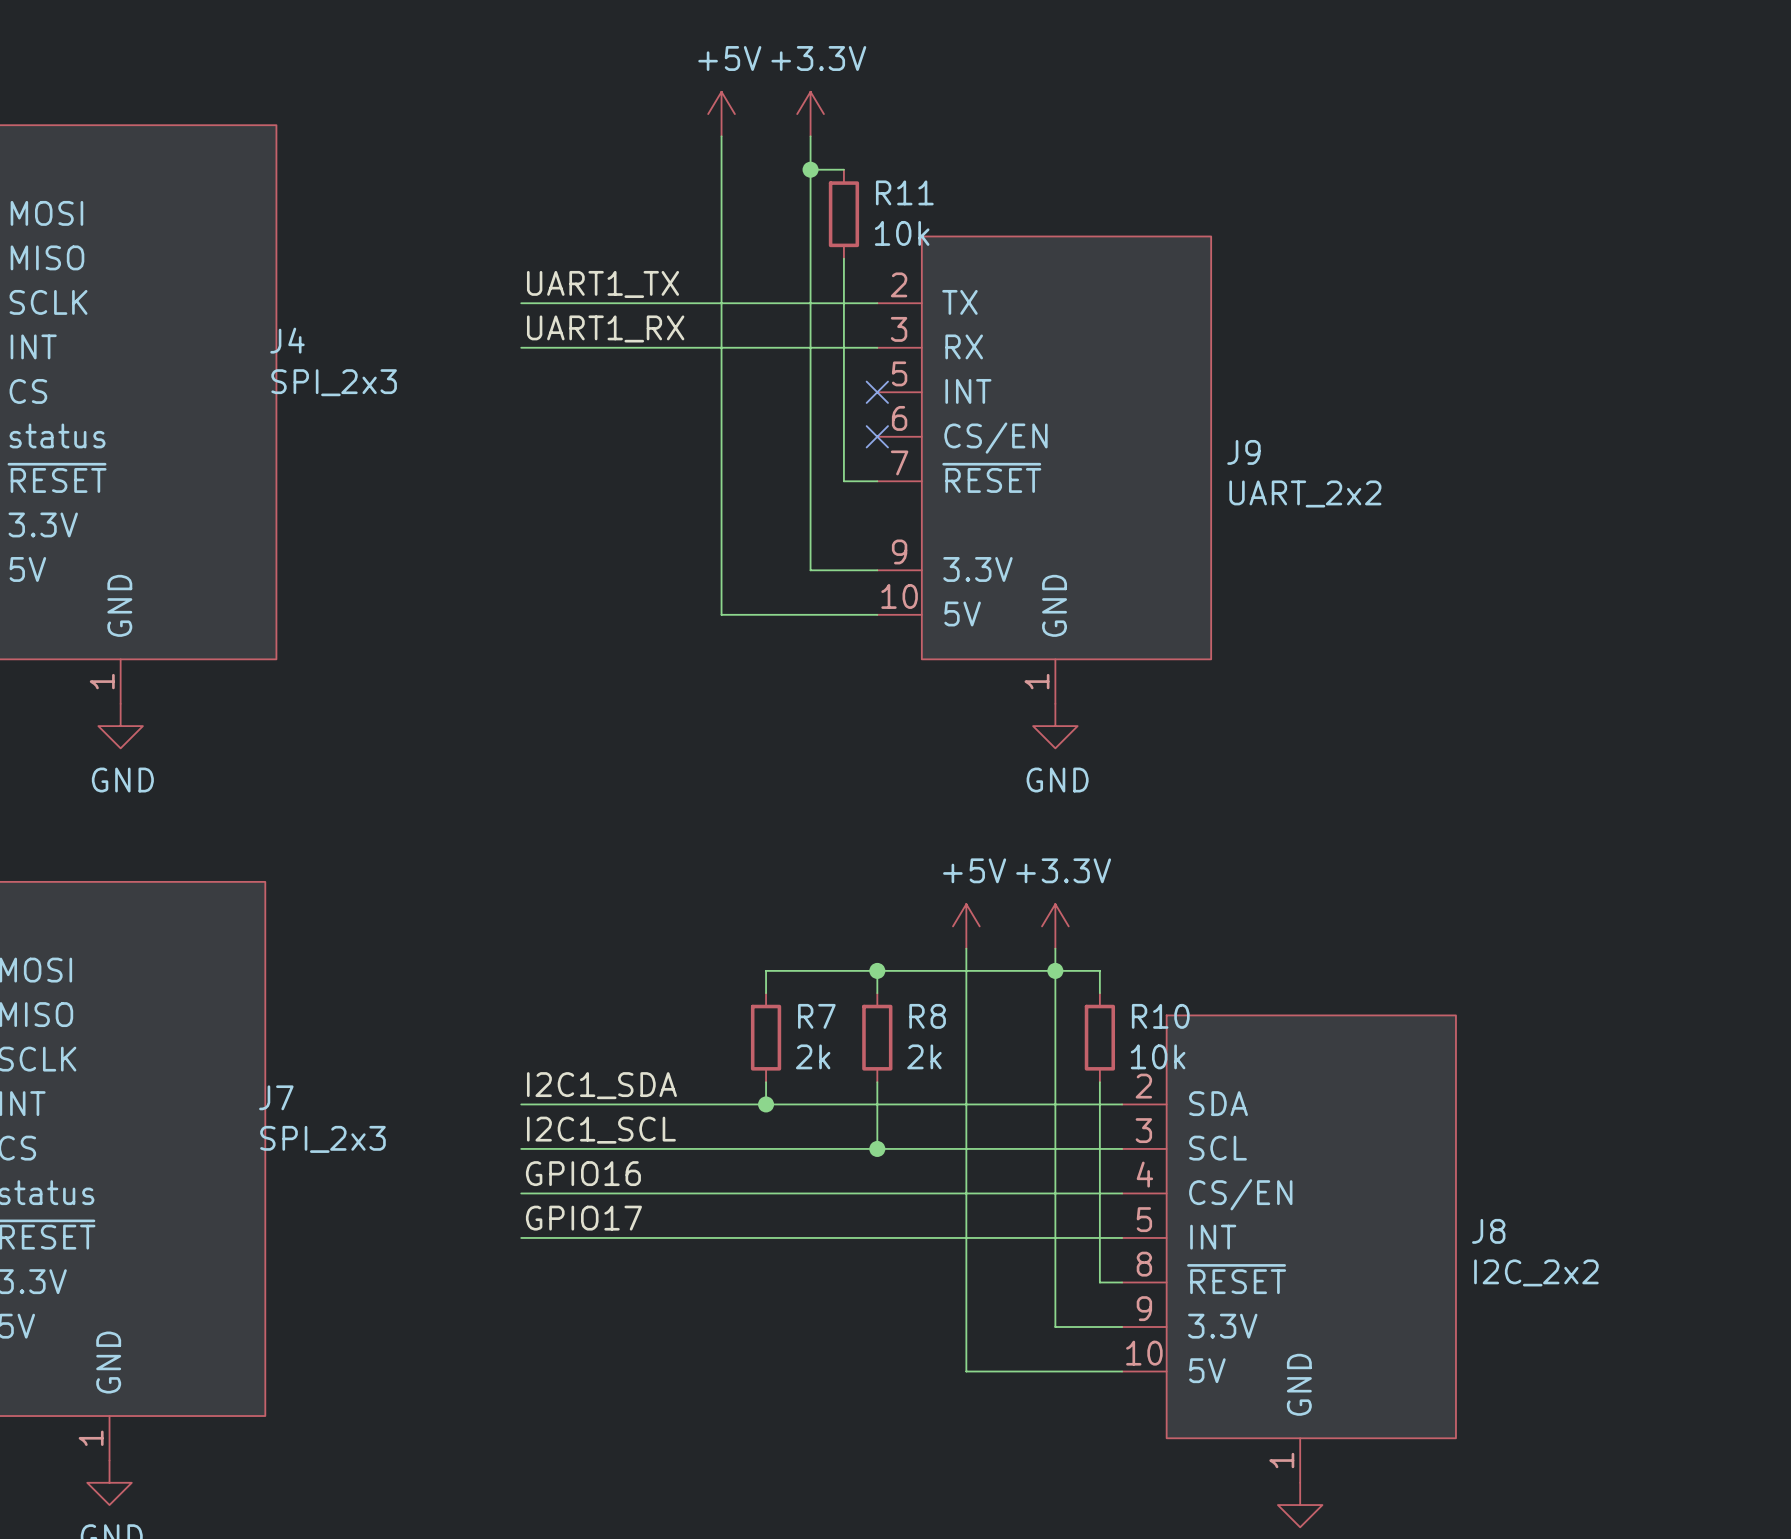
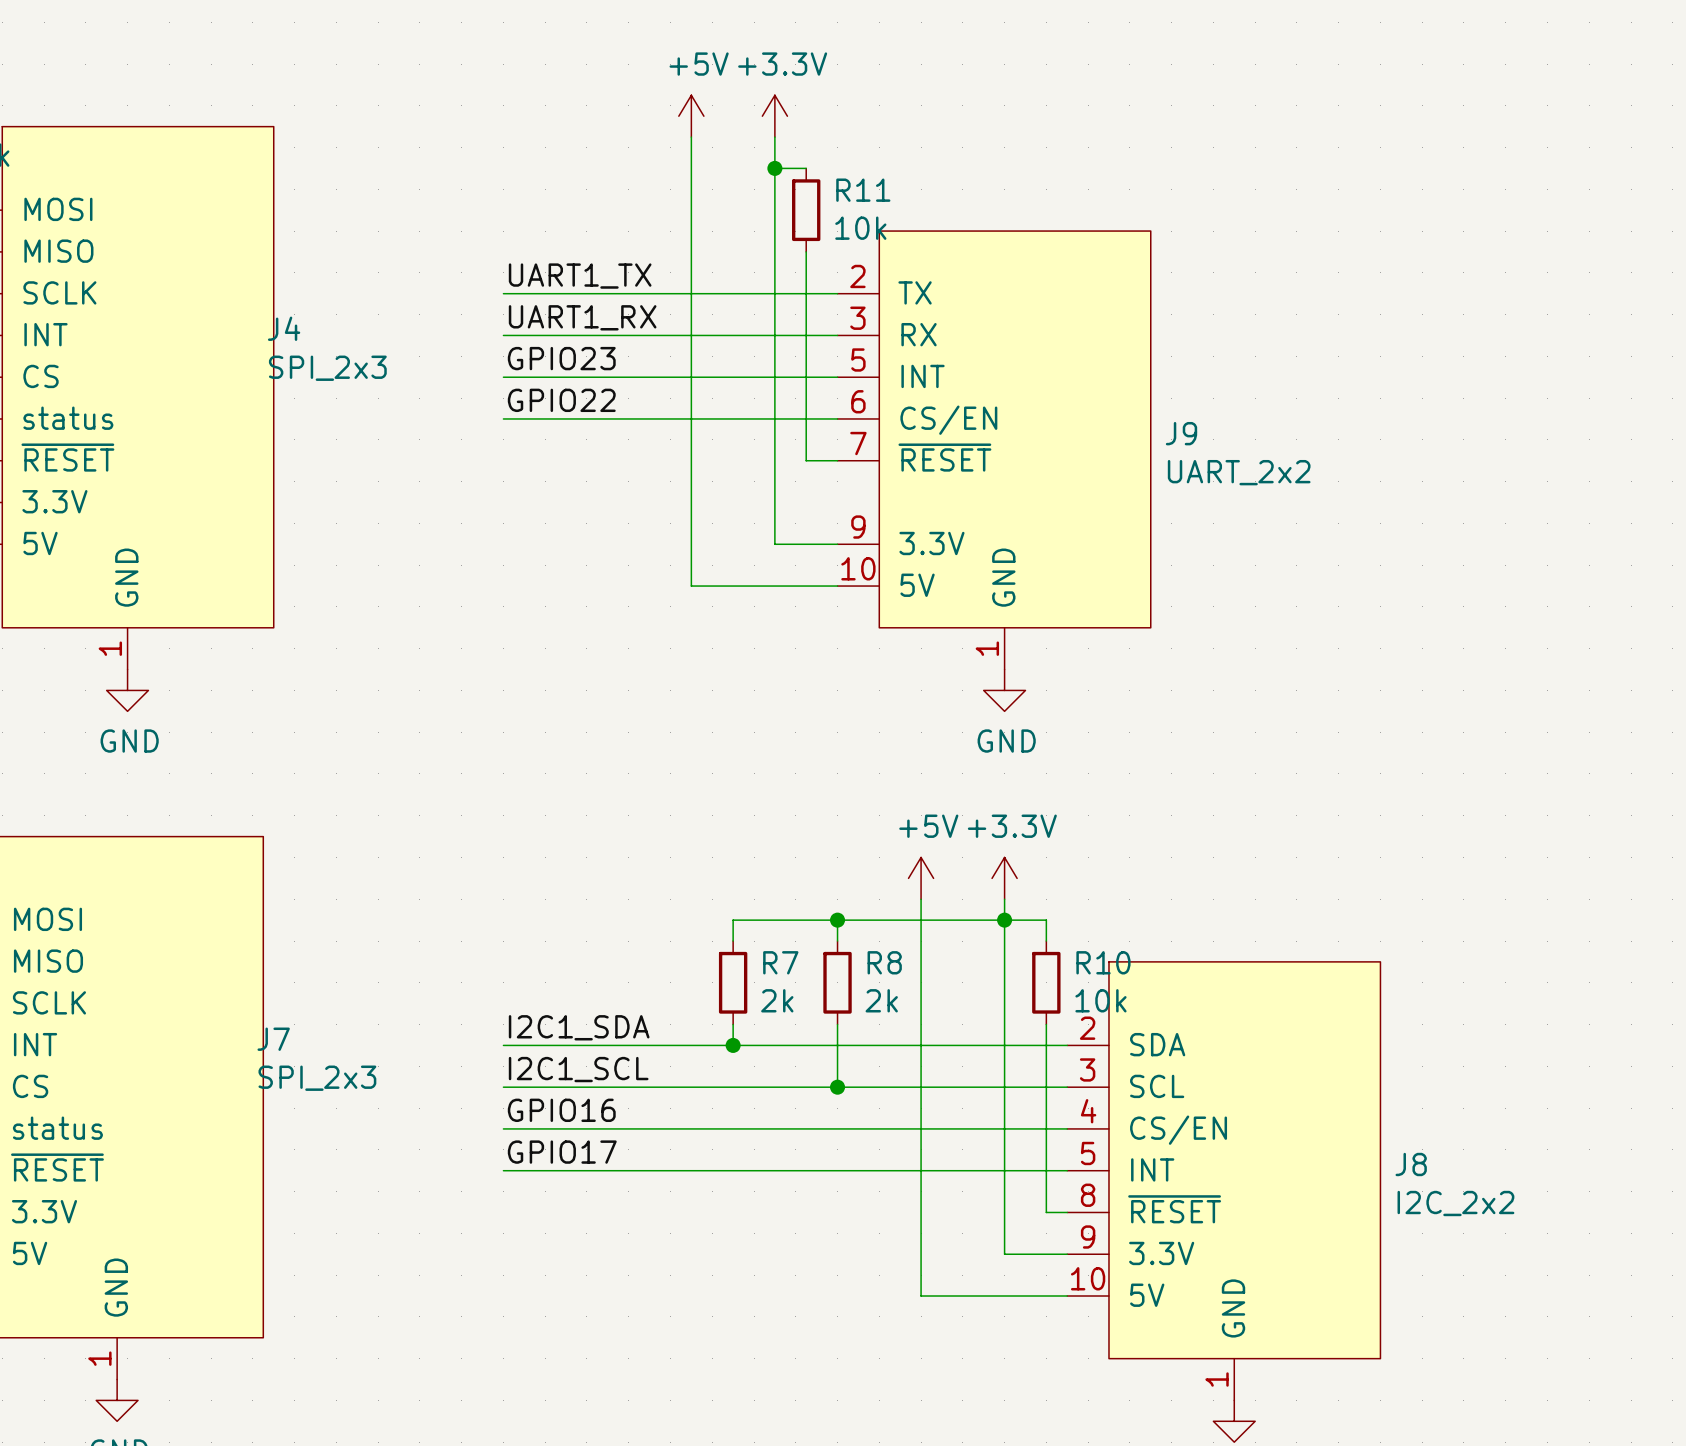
label: none -> GPIO23 (561, 358)
wire: none -> (503, 377) (837, 377)
no-connect mark: (877, 392) -> none
label: none -> GPIO22 (561, 400)
wire: none -> (503, 418) (837, 418)
no-connect mark: (877, 436) -> none

